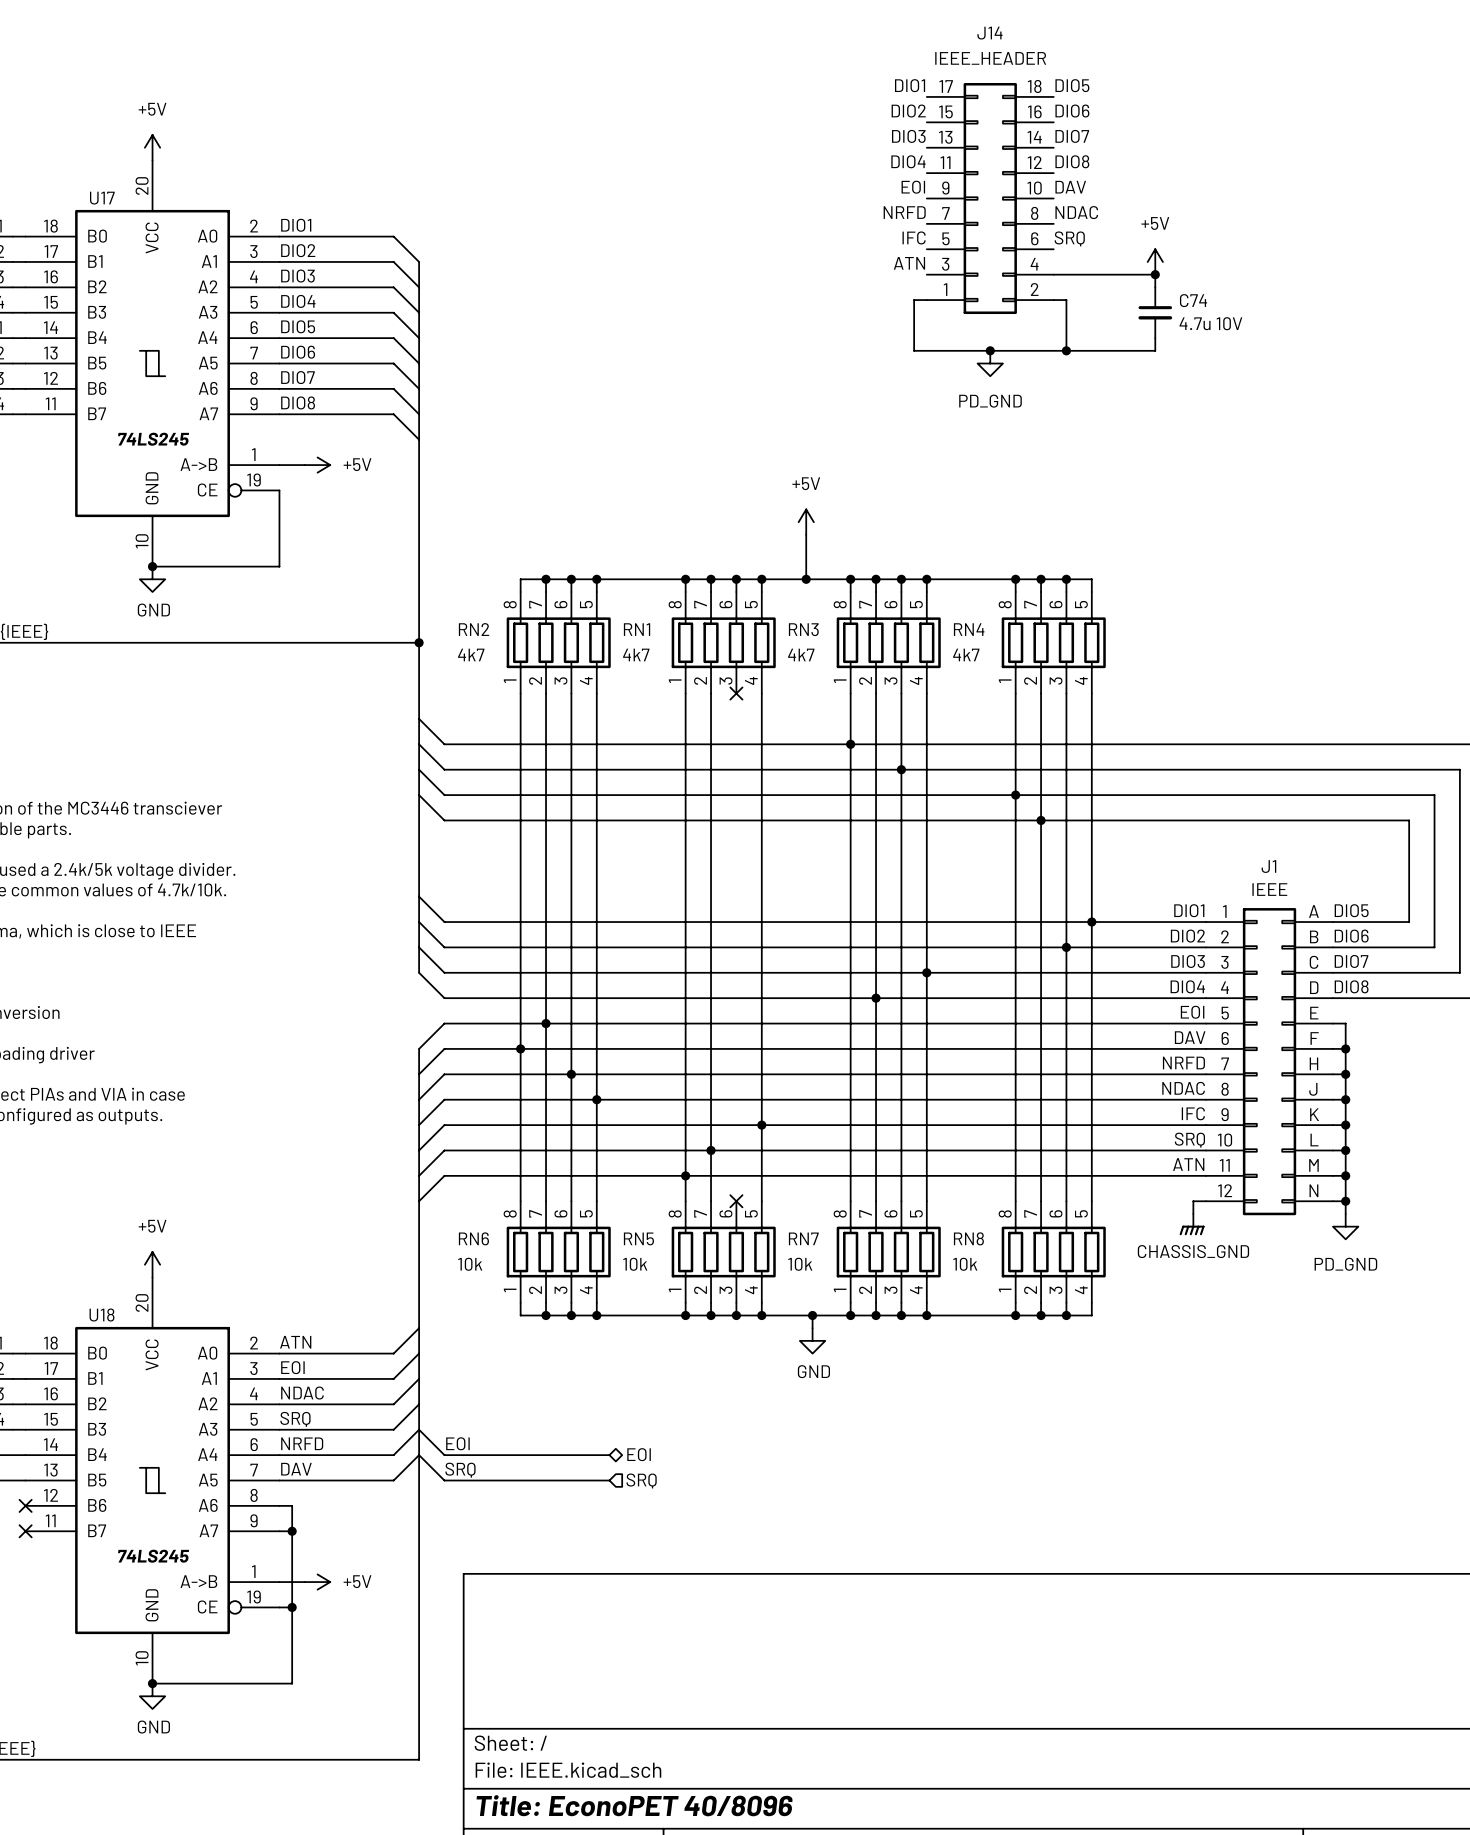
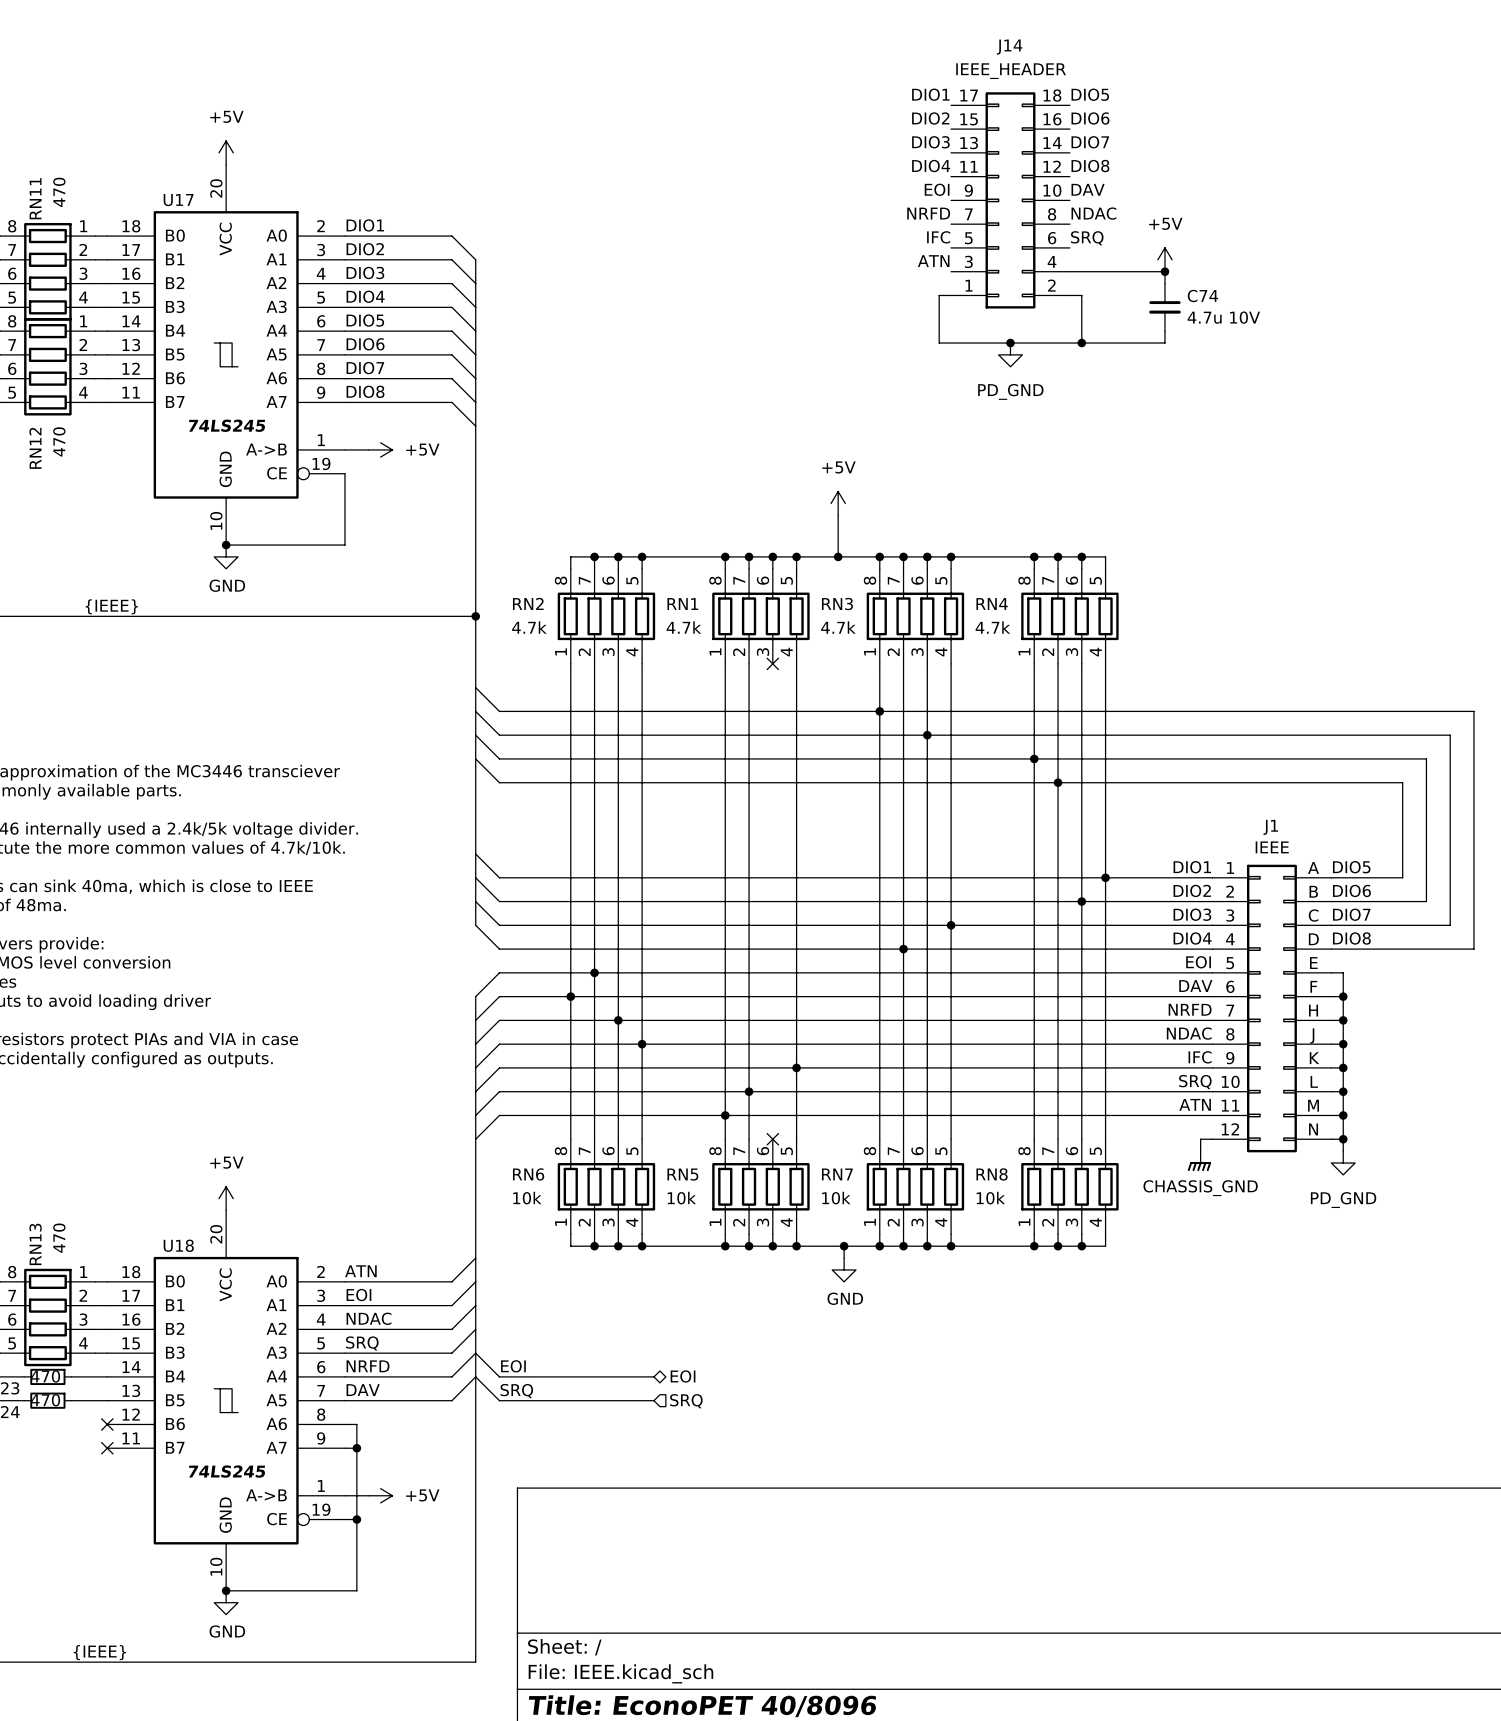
RN2 value: 4k7 (471, 654) -> 4.7k (529, 627)
RN1 value: 4k7 (636, 654) -> 4.7k (683, 627)
RN3 value: 4k7 (801, 654) -> 4.7k (838, 627)
RN4 value: 4k7 (966, 654) -> 4.7k (992, 627)

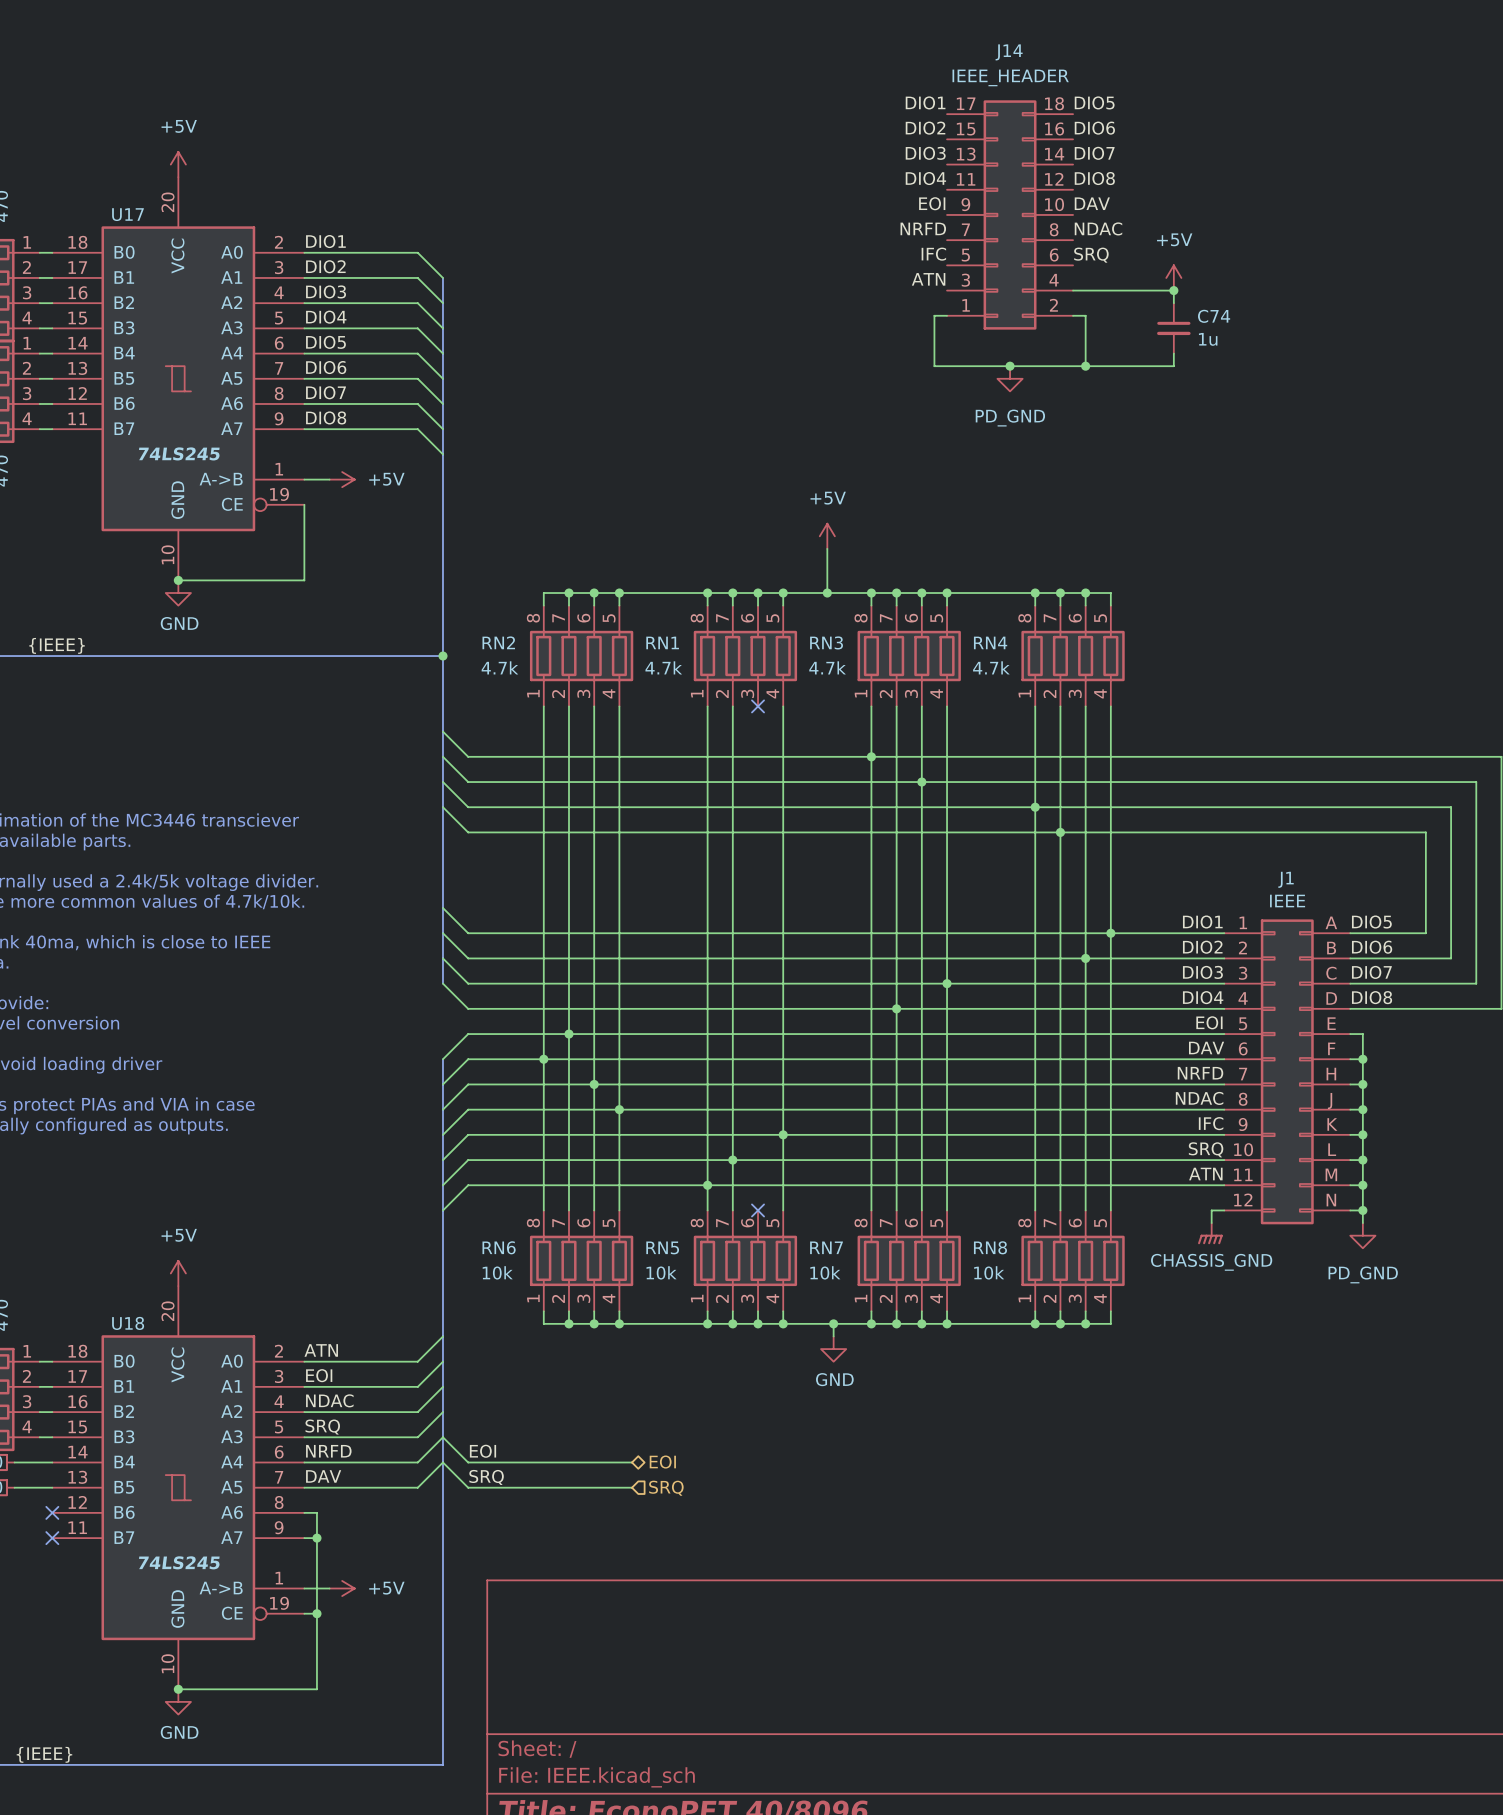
C74 value: 4.7u 10V (1223, 317) -> 1u (1208, 339)

